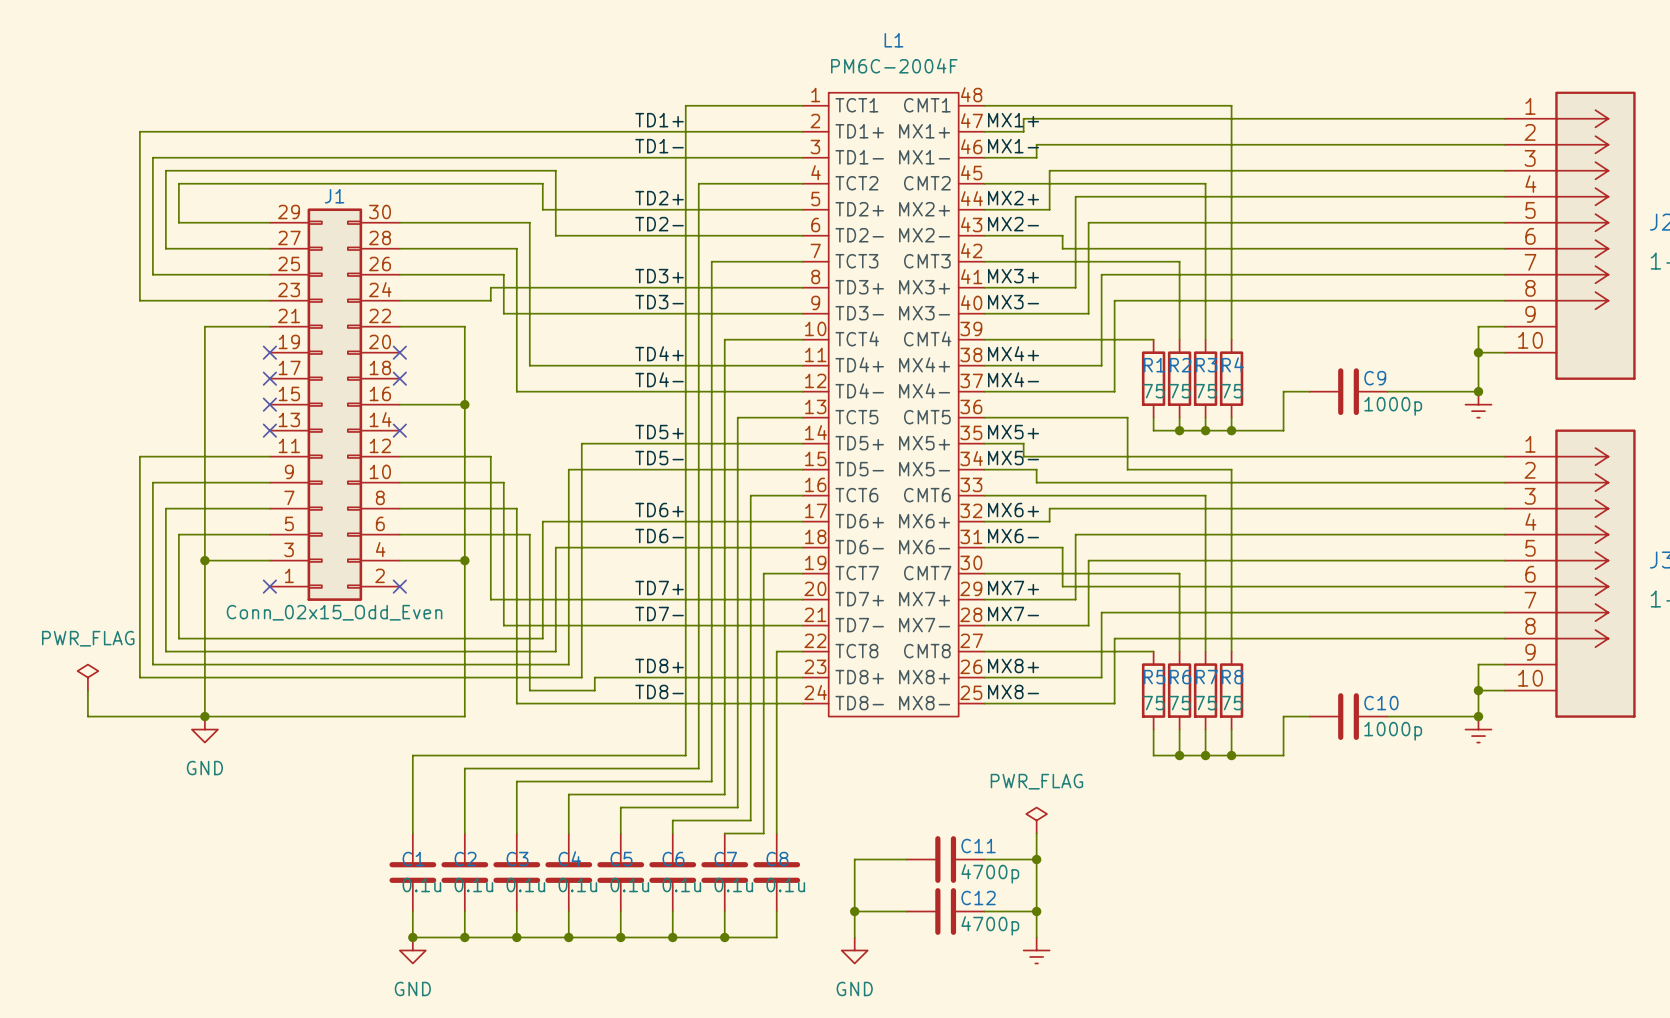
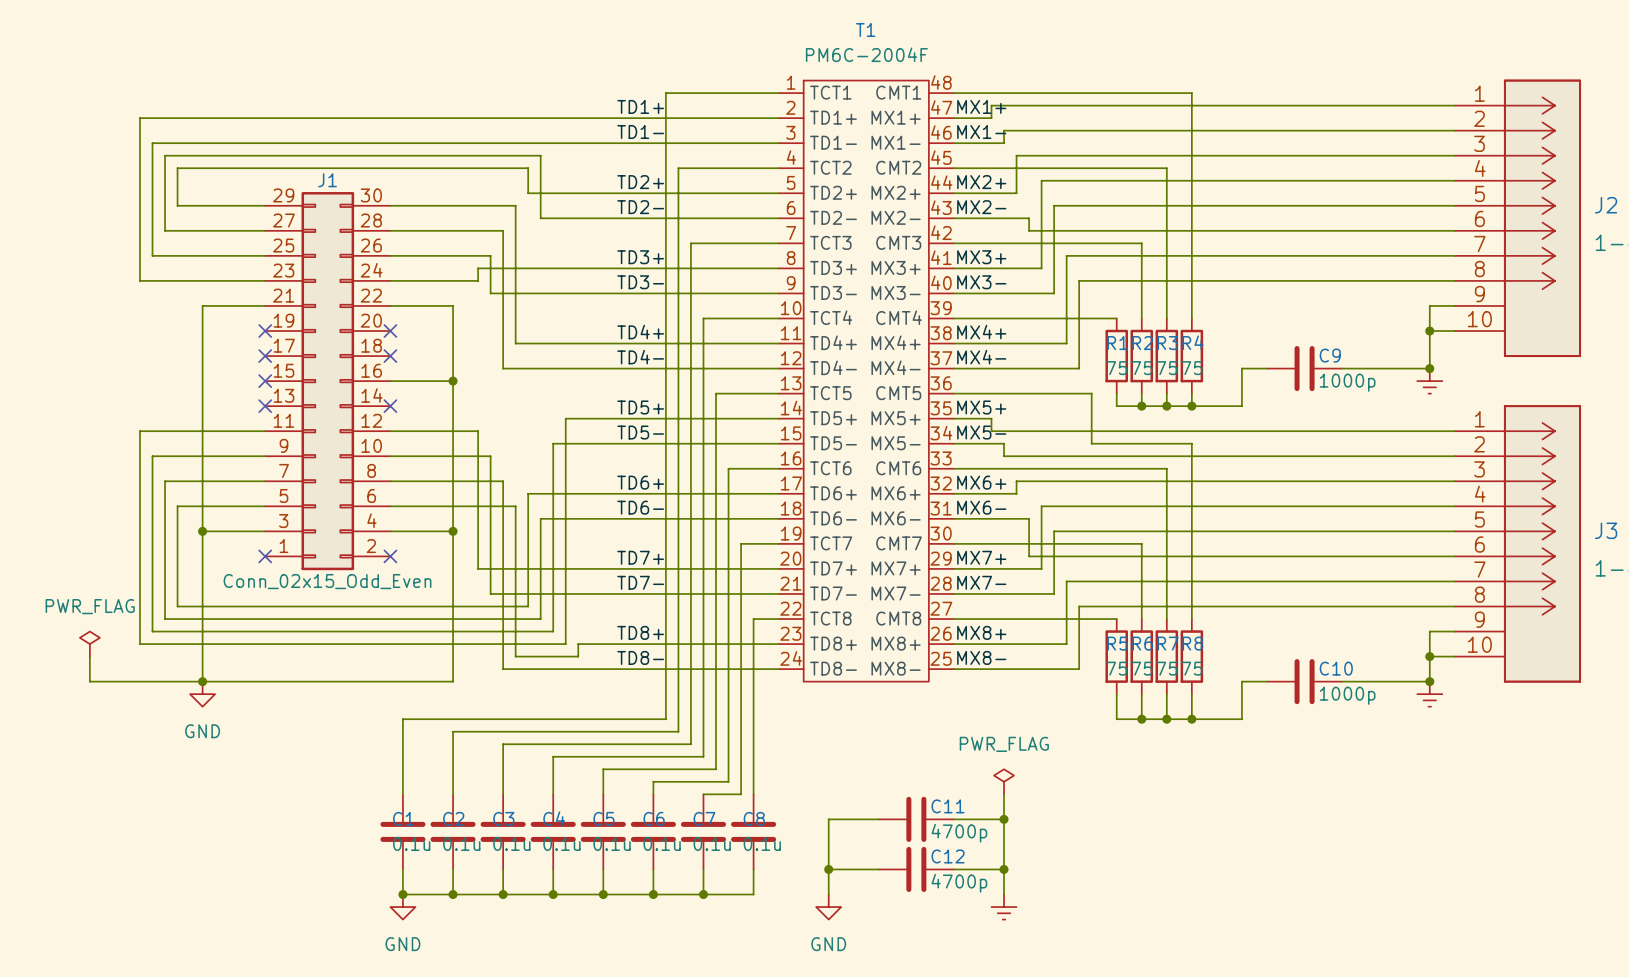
L1 name: L1 (893, 40) -> T1 (865, 30)

